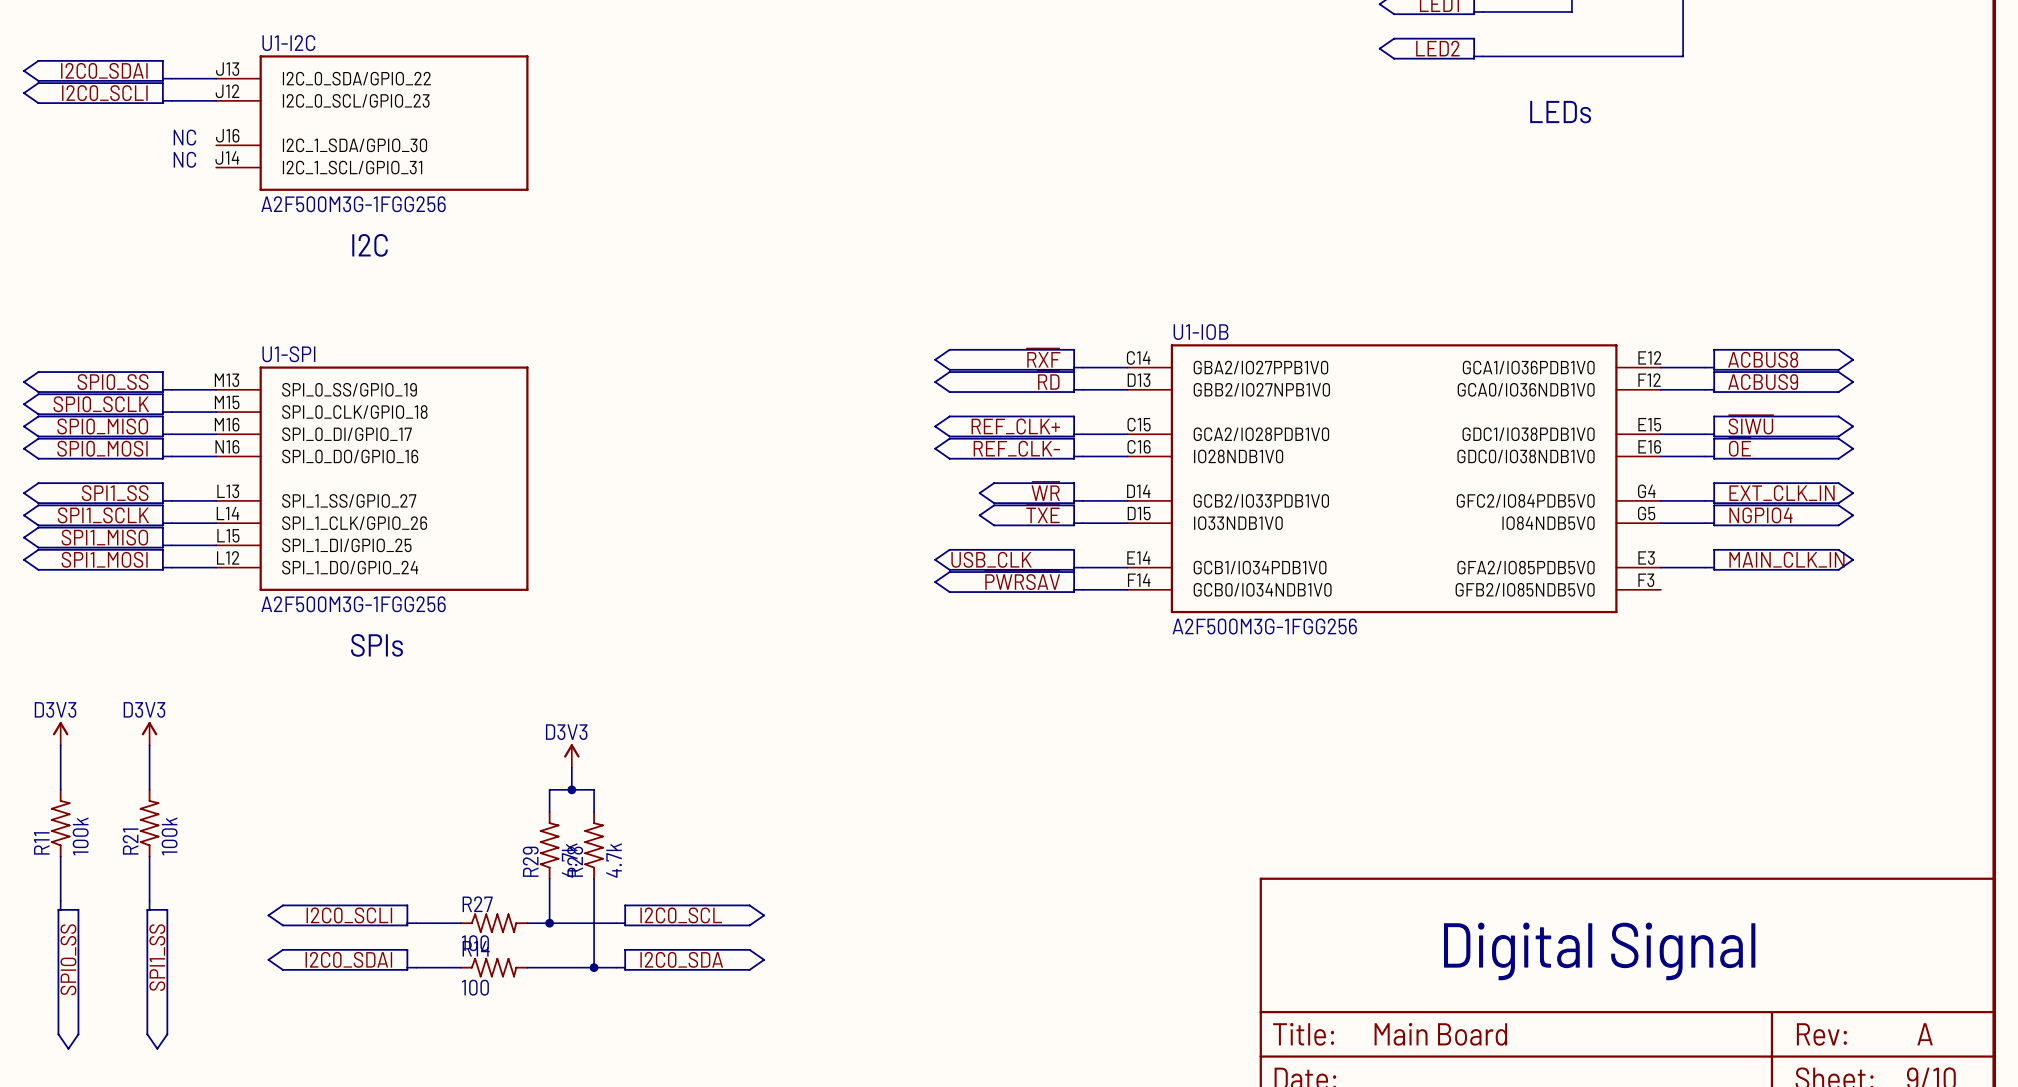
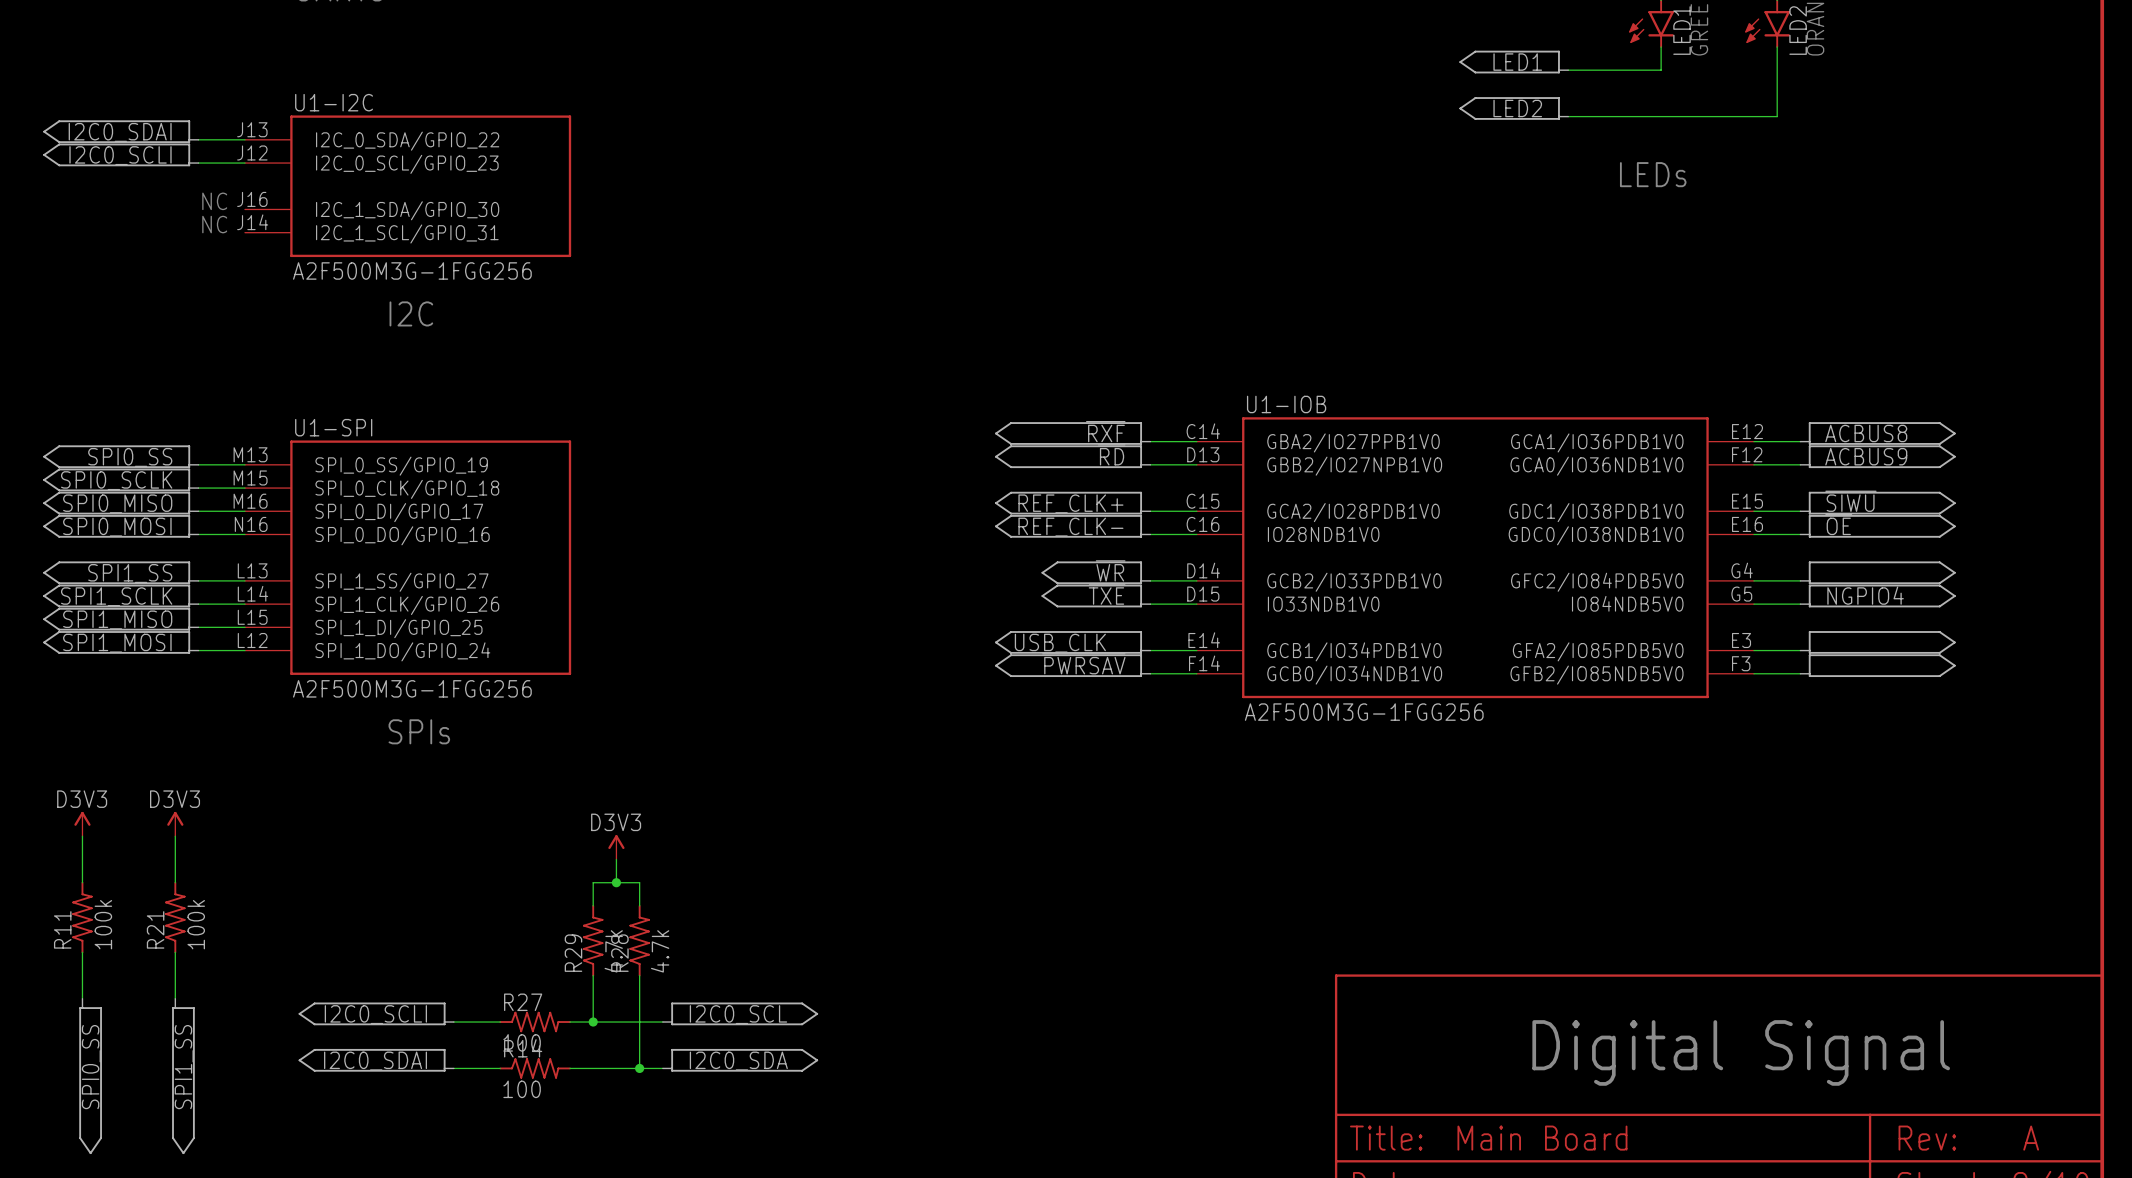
label: EXT_CLK_IN (1782, 493) -> none
label: MAIN_CLK_IN (1786, 559) -> none
part: none -> (1877, 665)
wire: none -> (1753, 673) (1800, 673)

